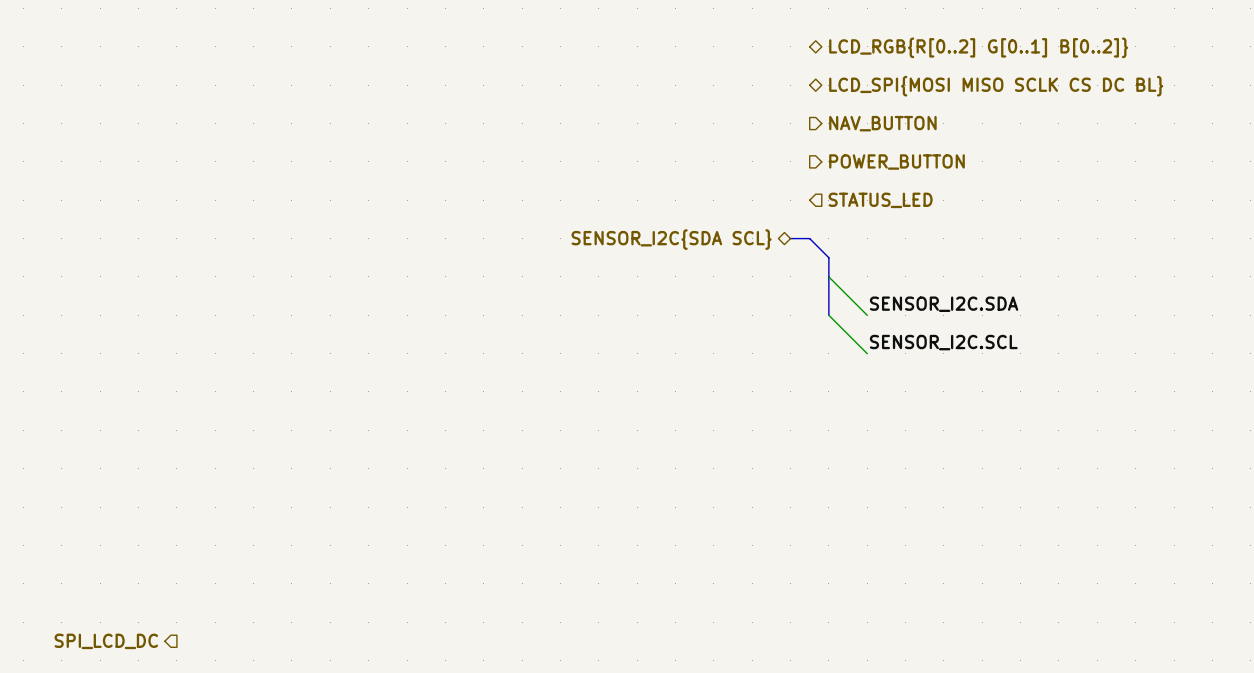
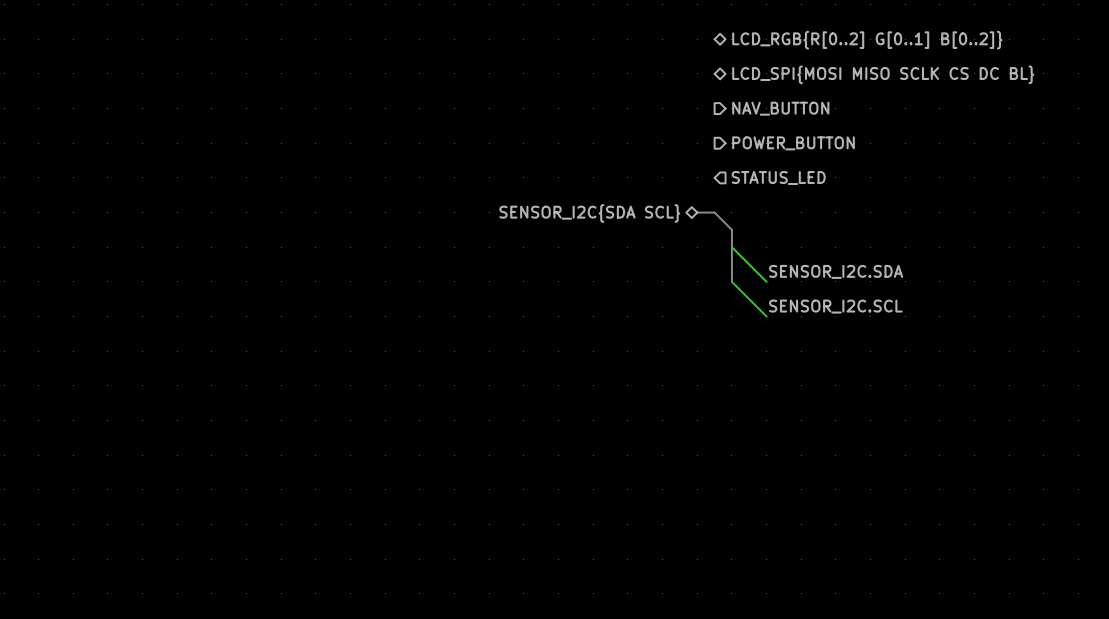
hierarchical label: SPI_LCD_DC (106, 641) -> none

